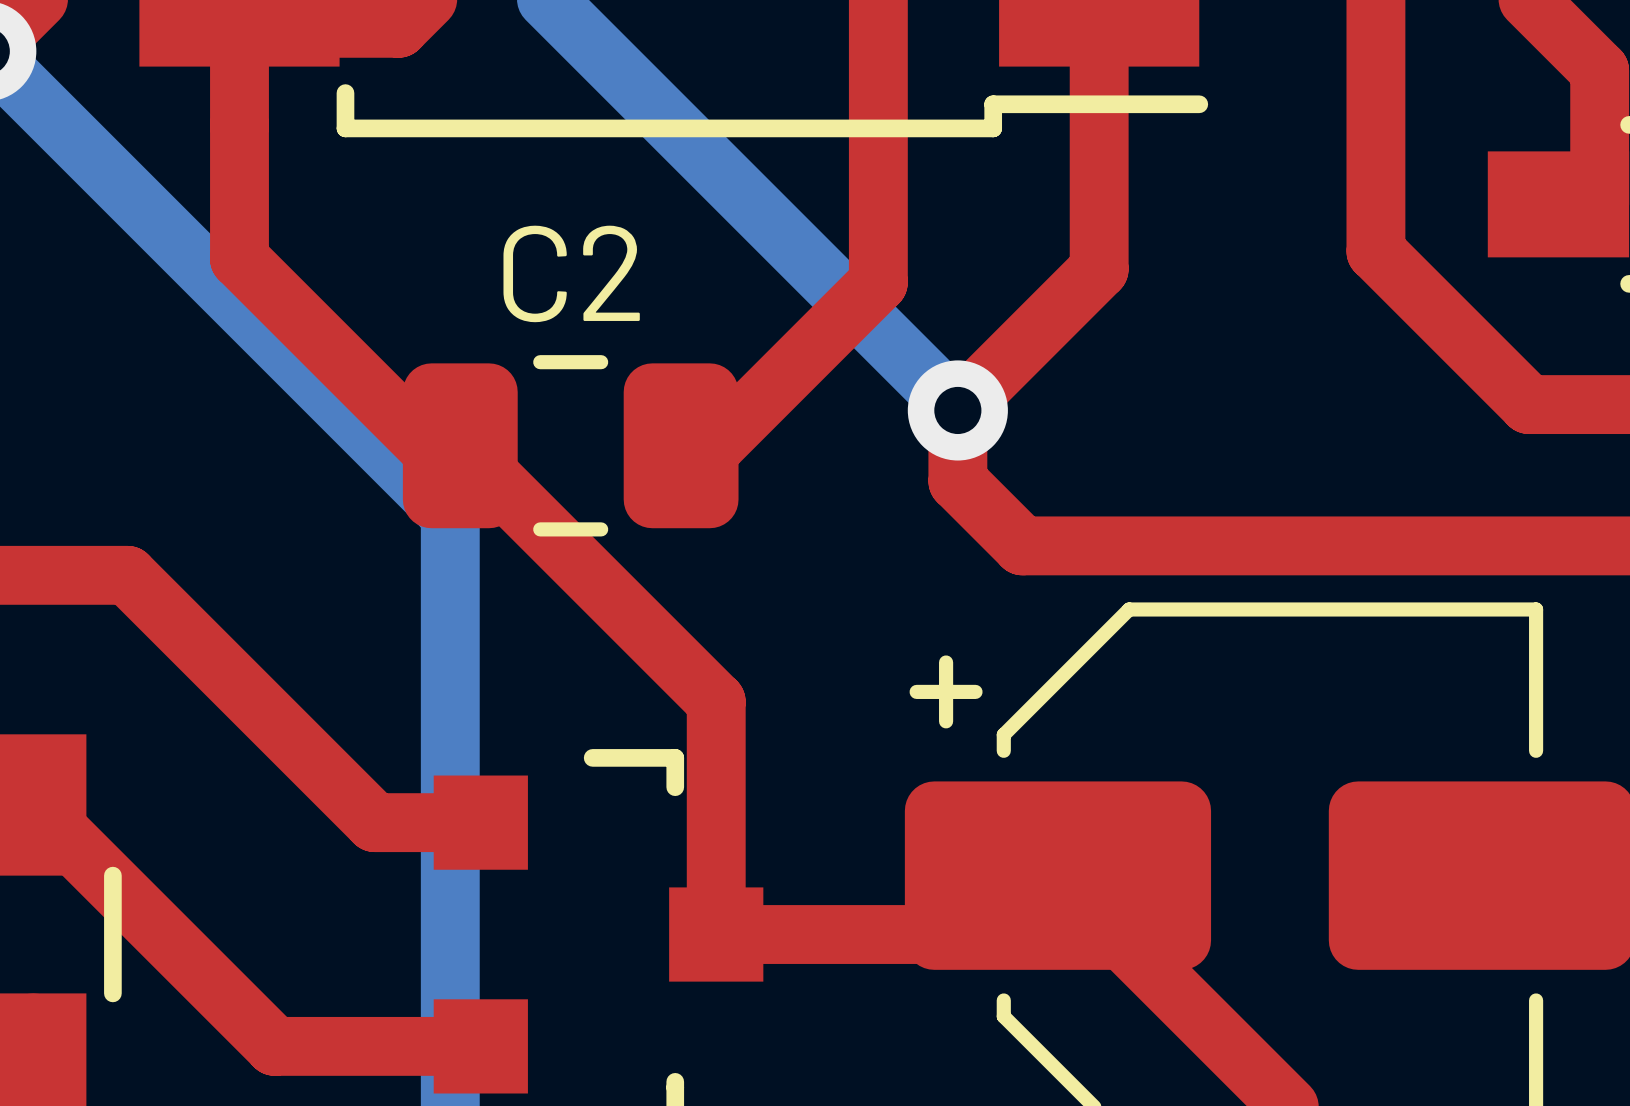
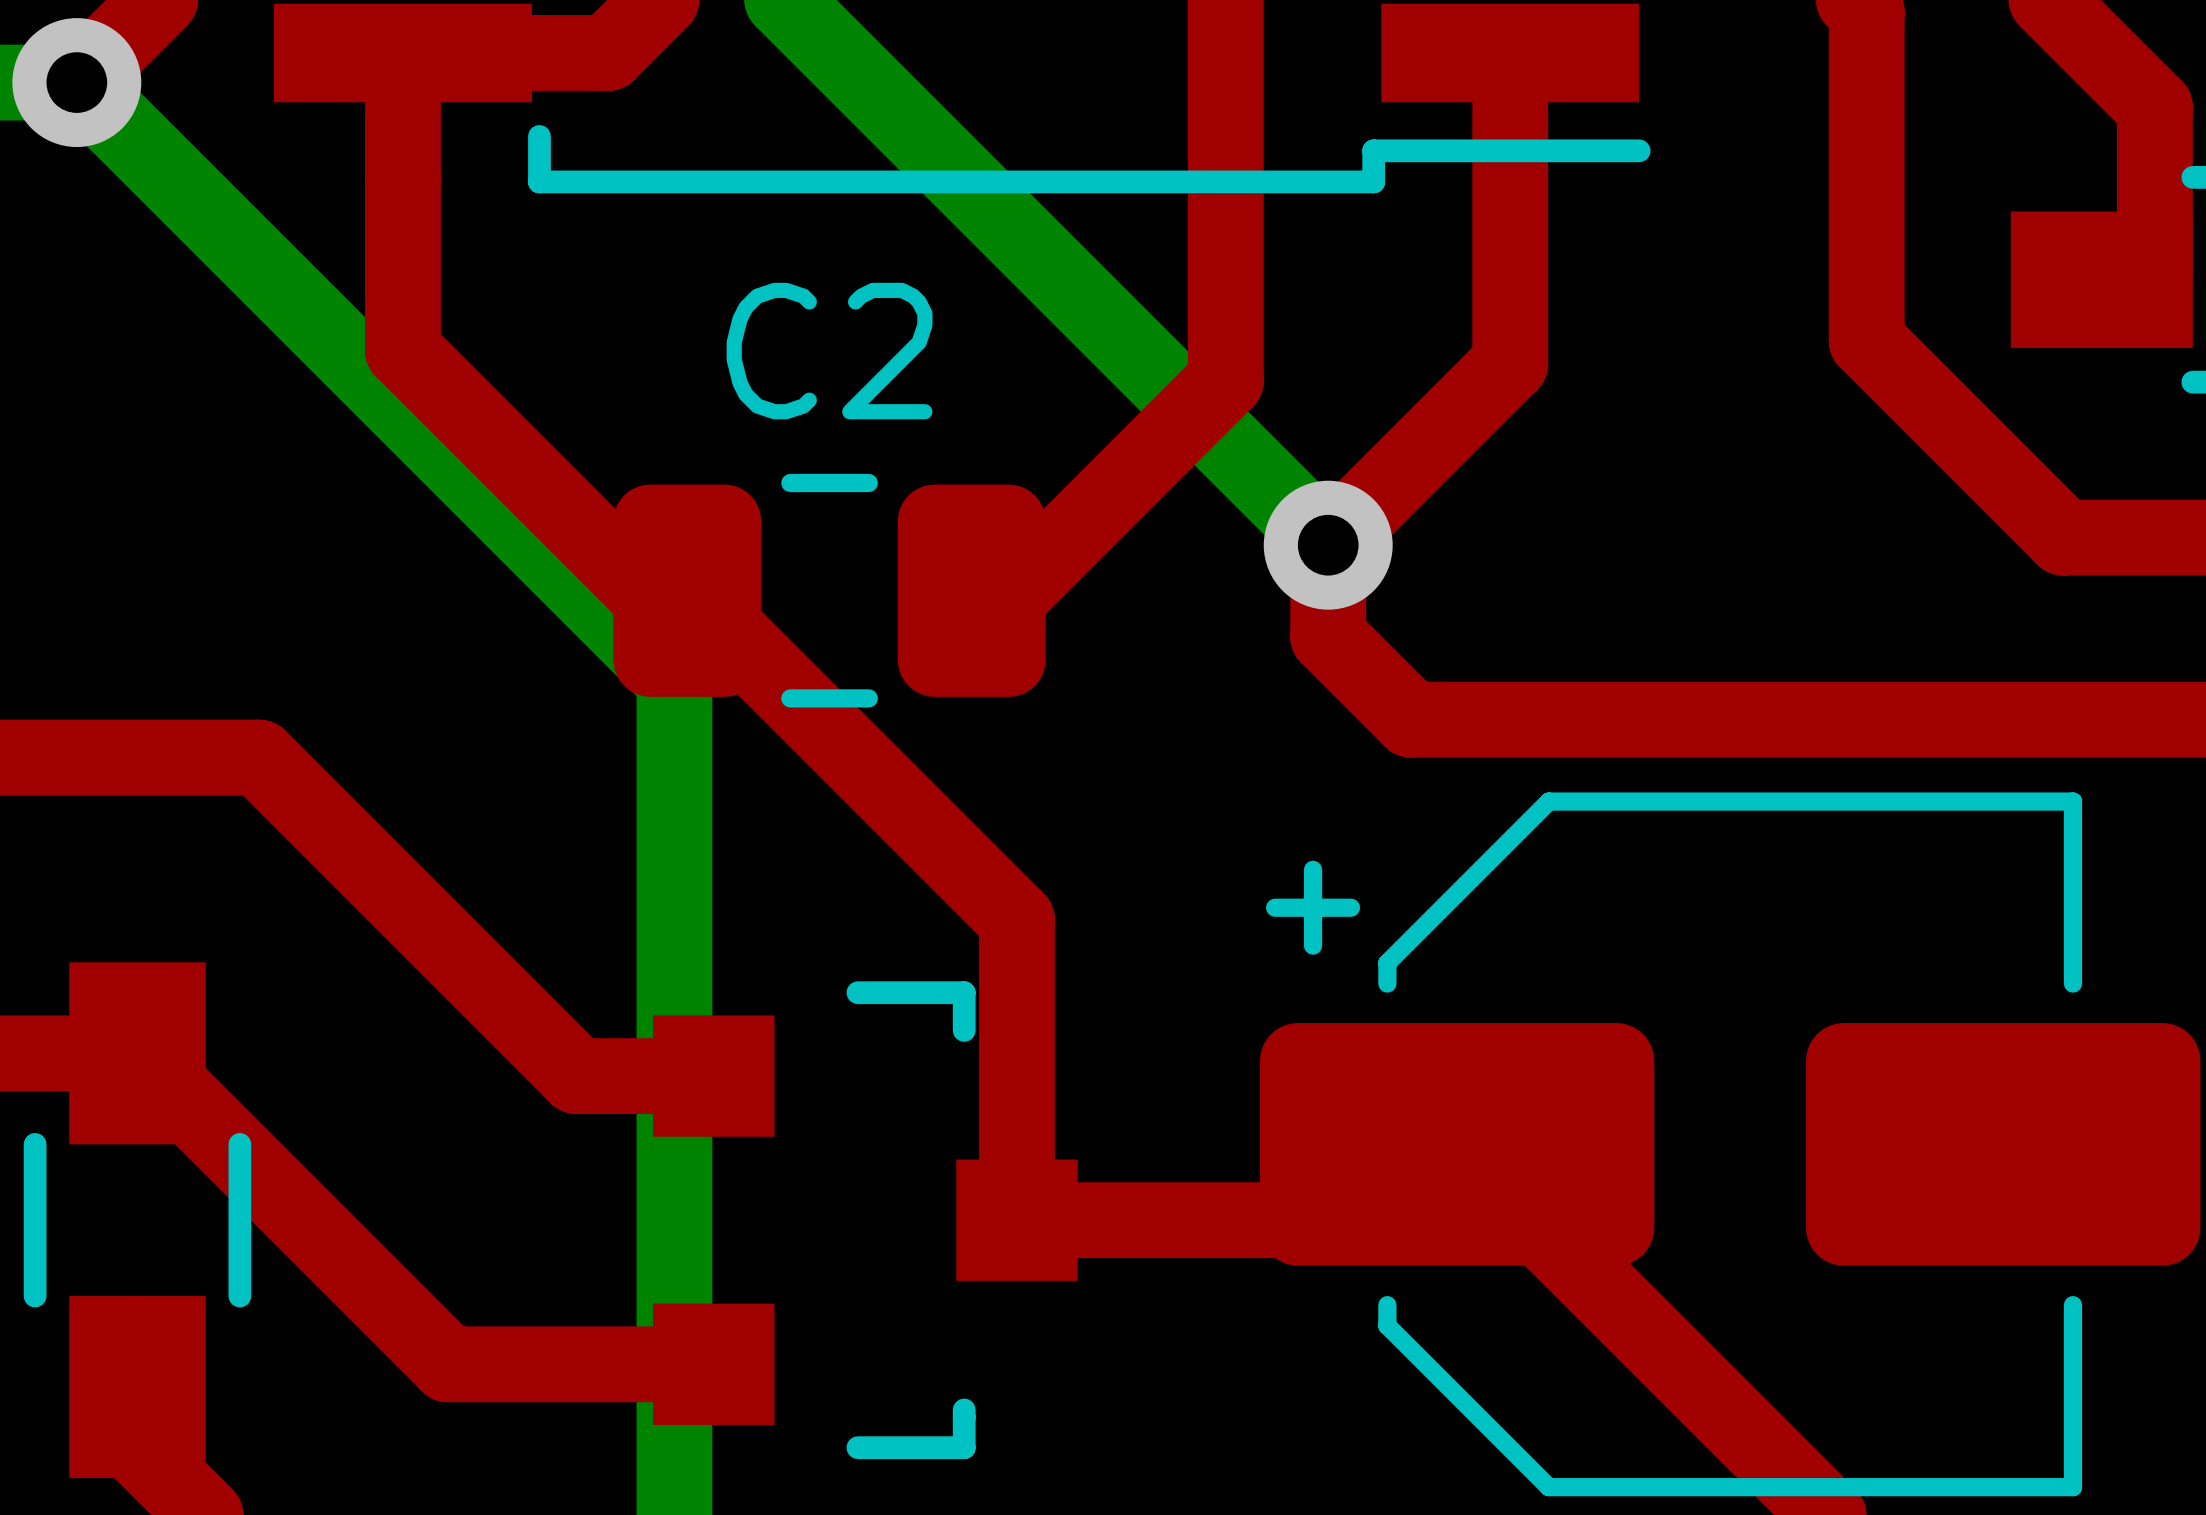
C2 name position: C2 (571, 273) -> C2 (829, 351)

